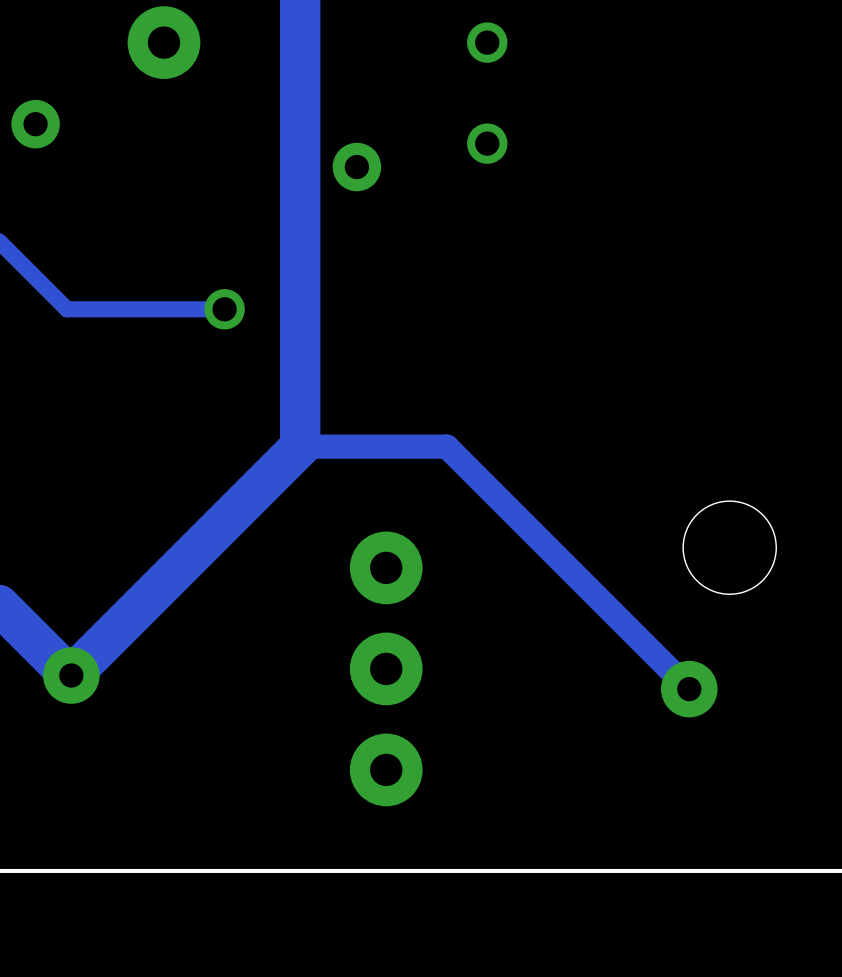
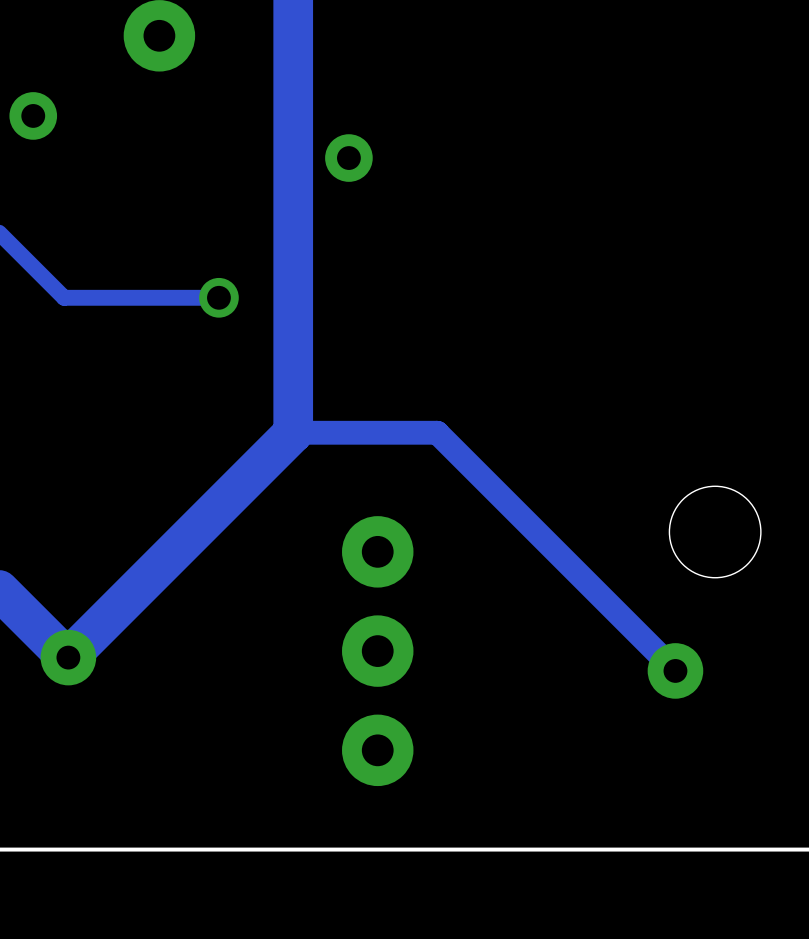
via: (487, 42) -> none
via: (487, 143) -> none

